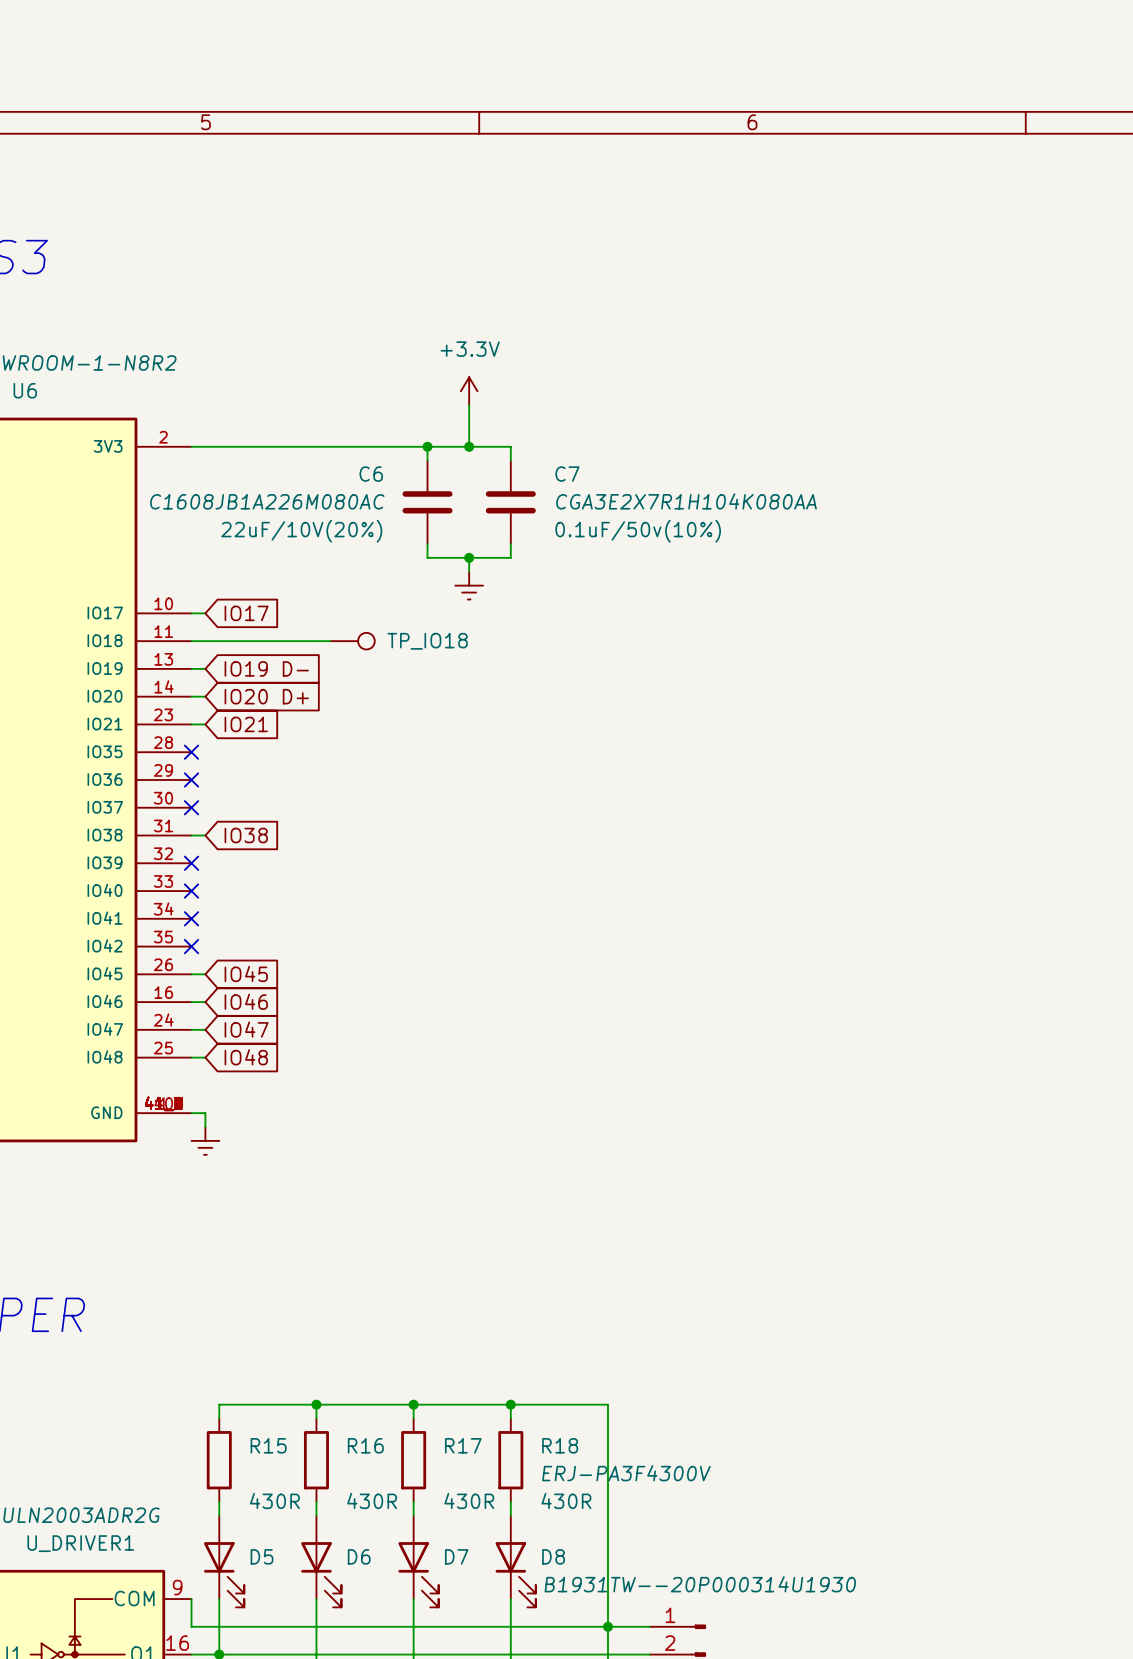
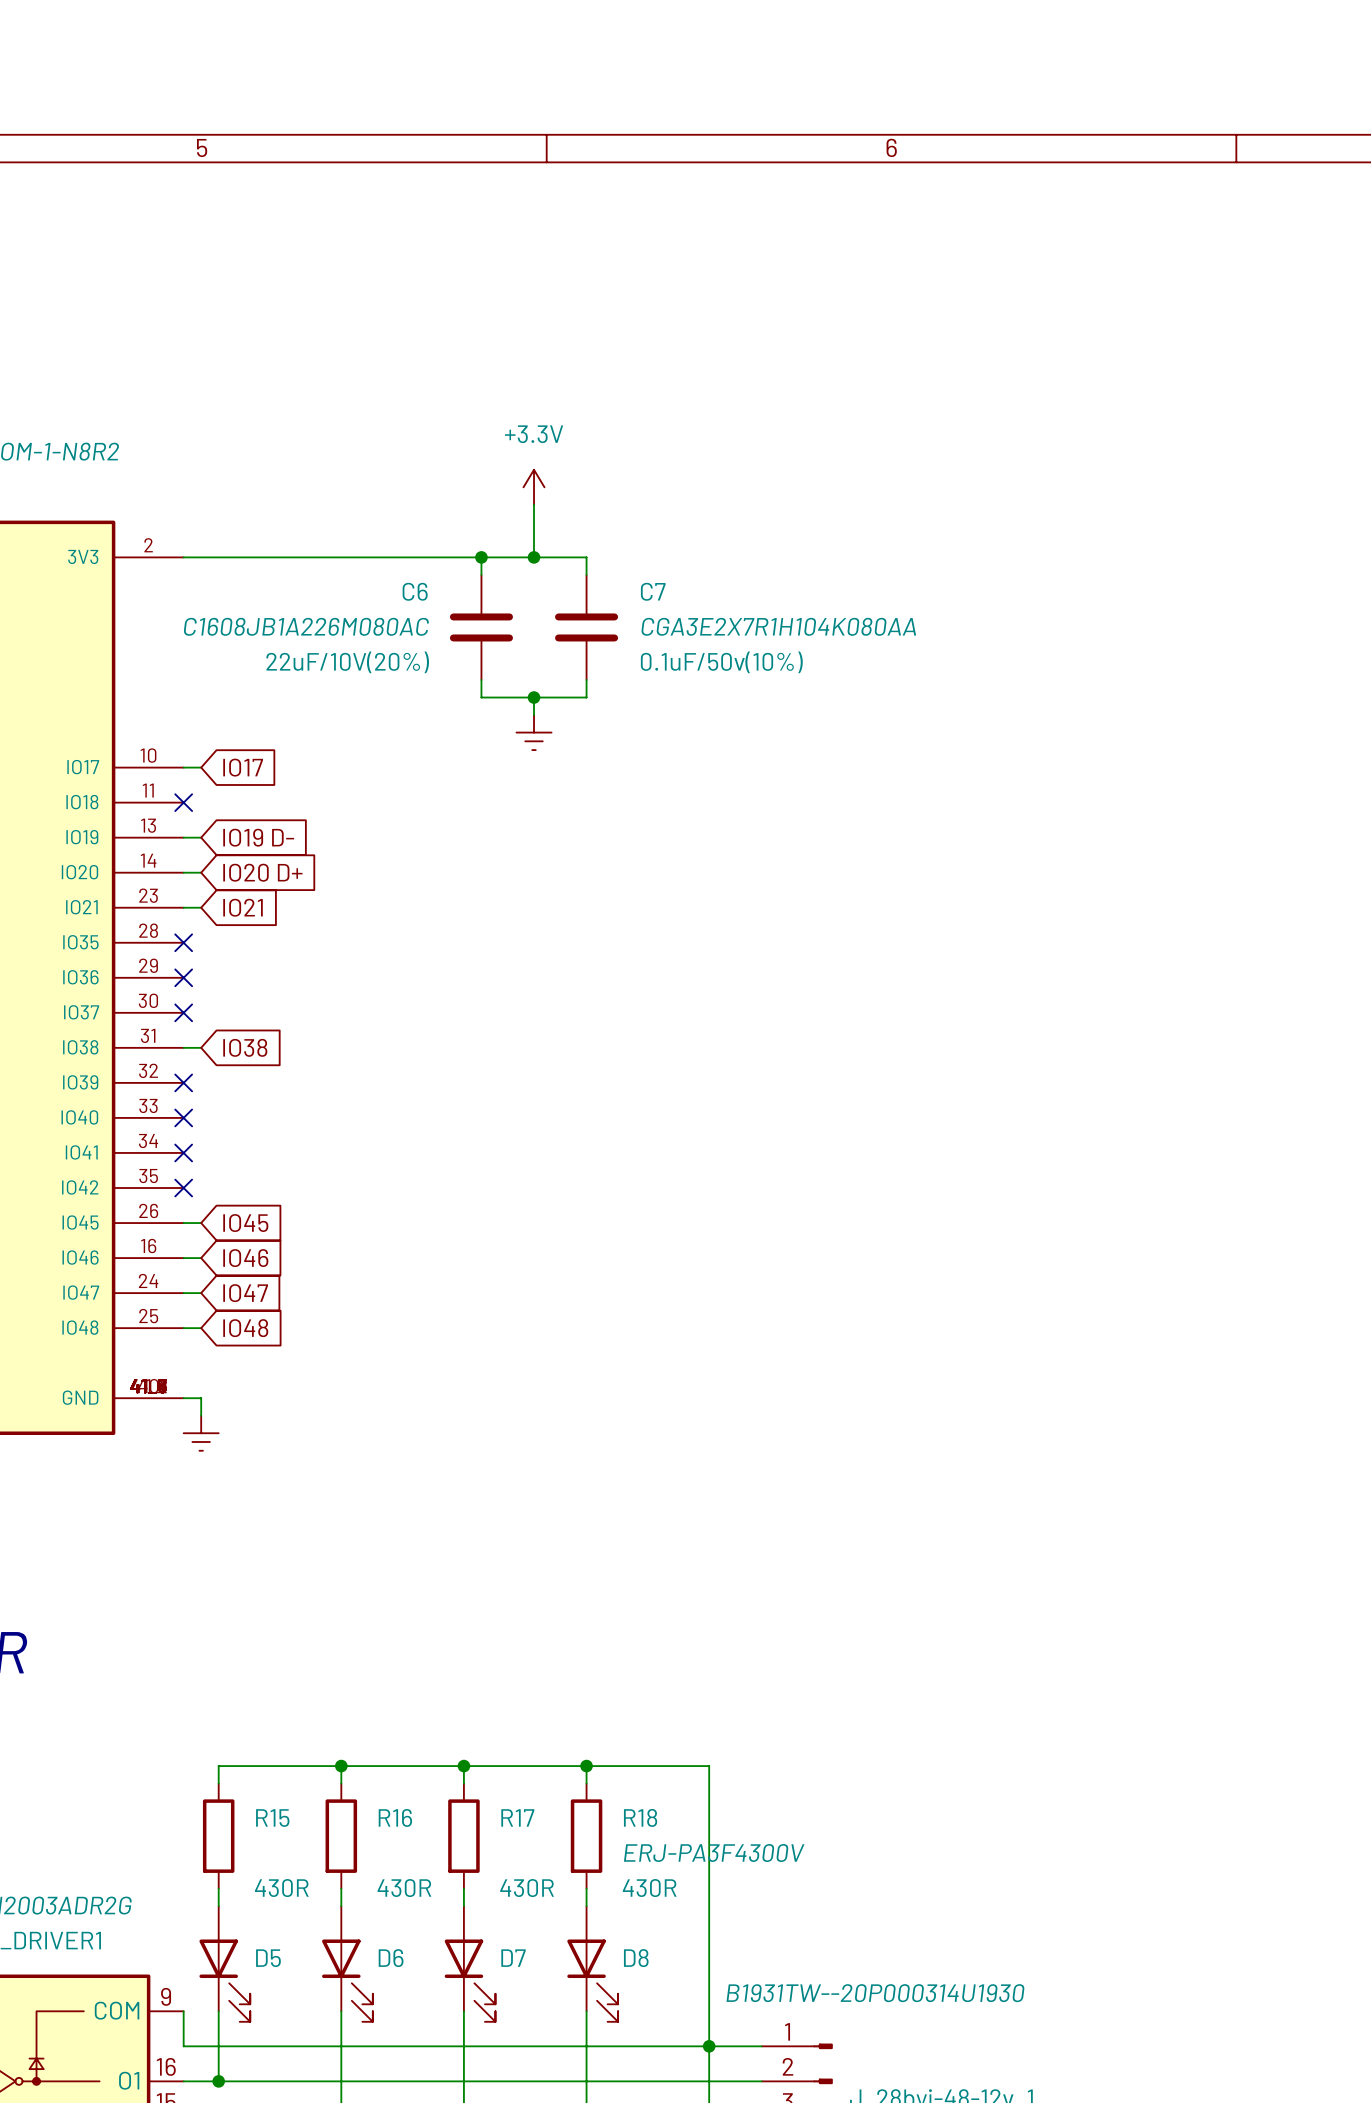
wire: (191, 641) (330, 641) -> none
no-connect mark: none -> (183, 802)
TP_IO18: (352, 641) -> none

